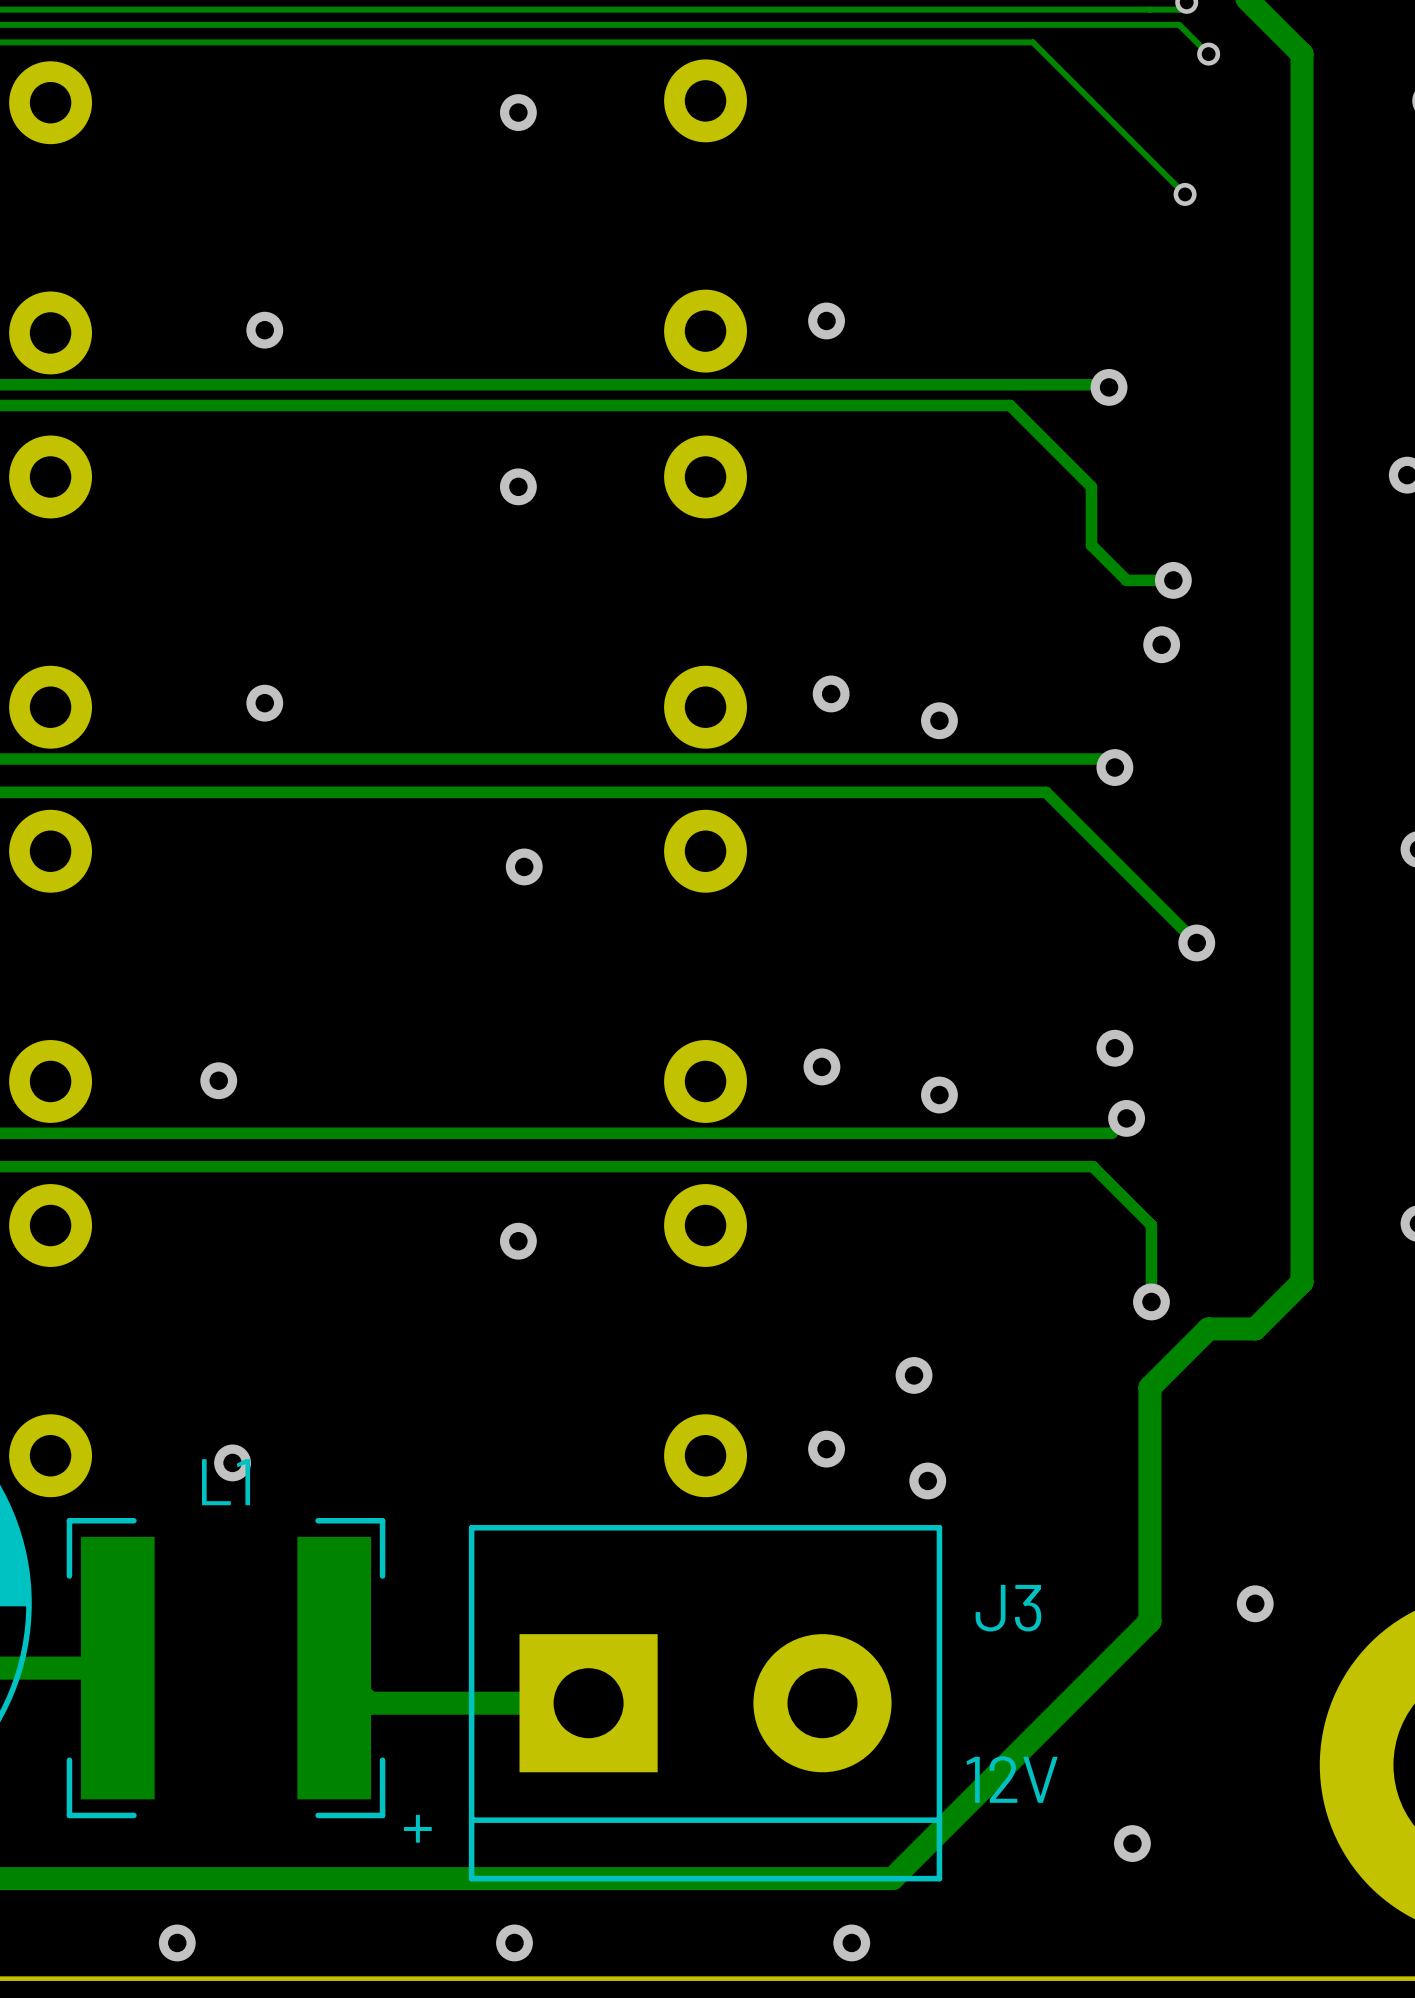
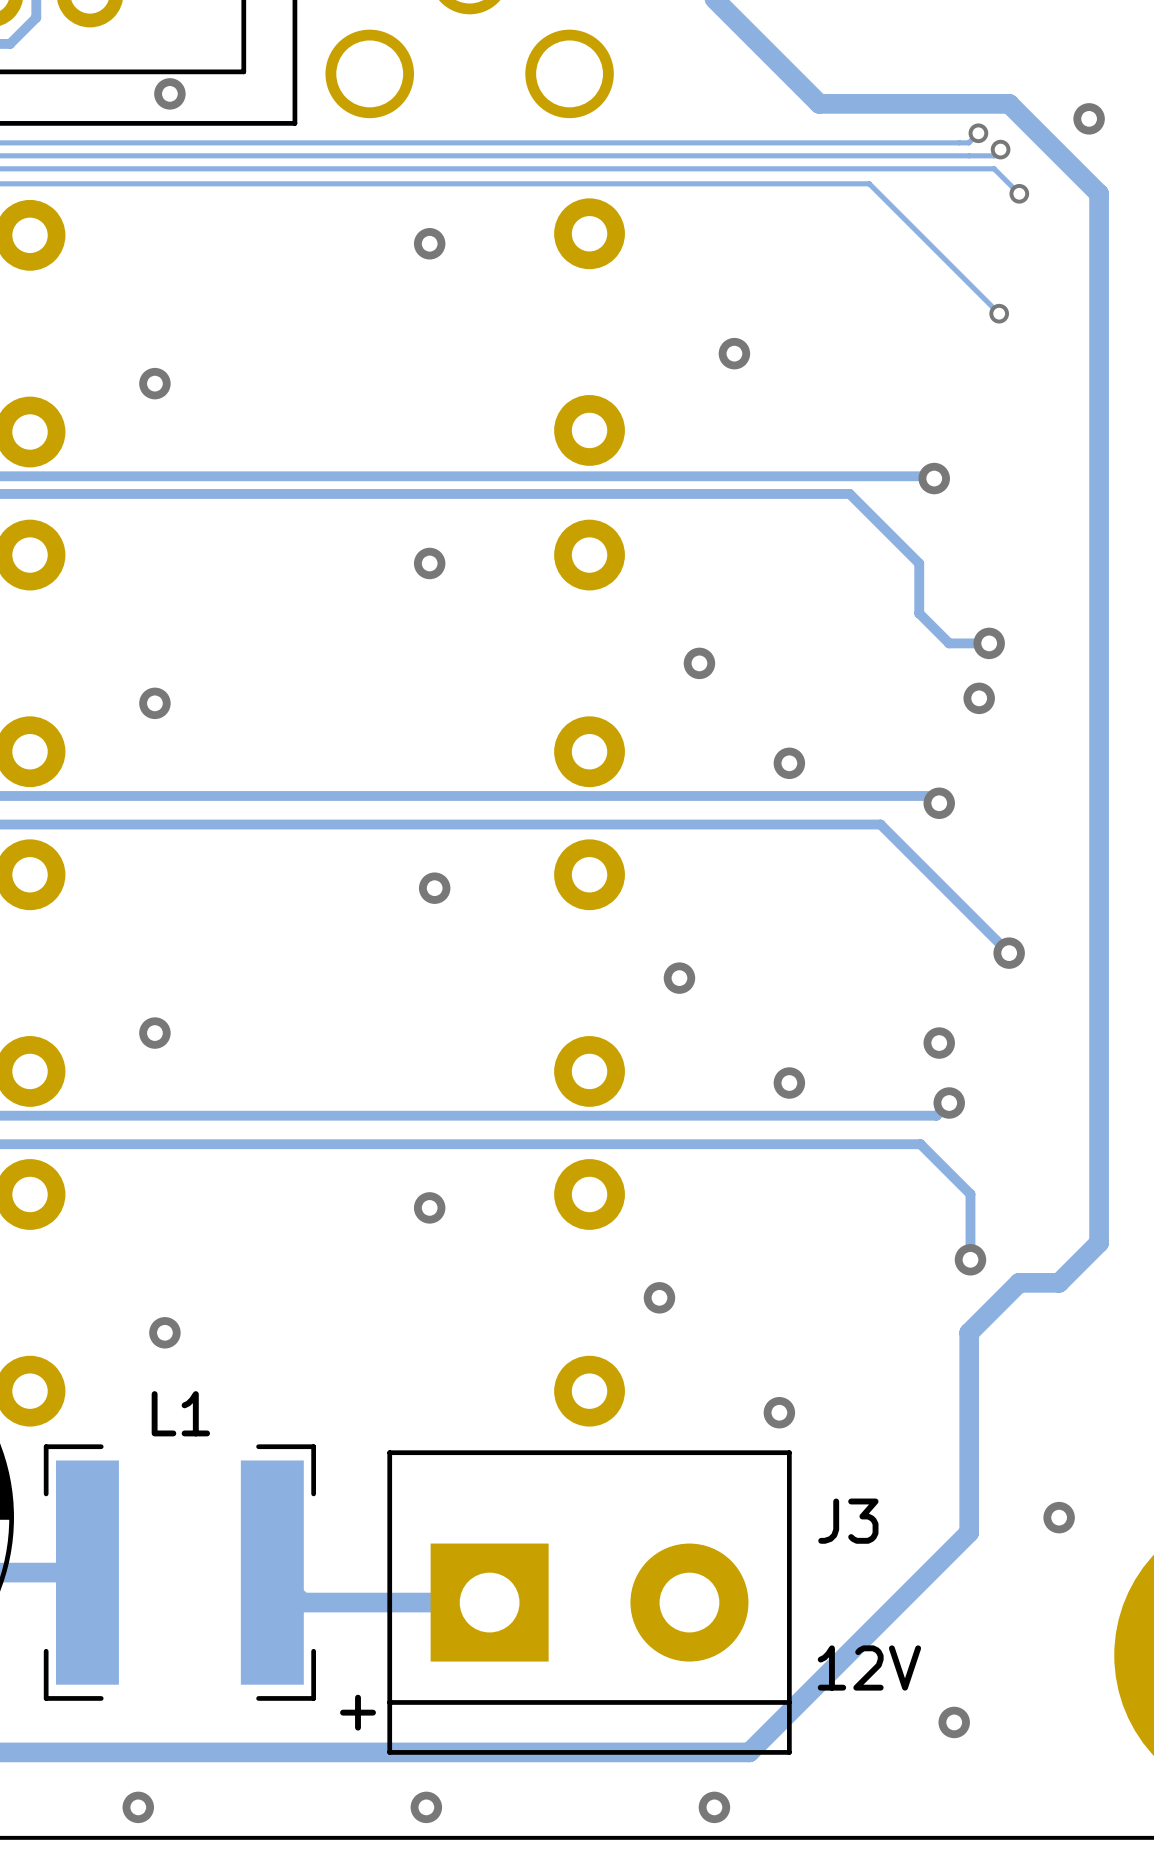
via position: (826, 320) -> (734, 353)
via position: (264, 330) -> (154, 383)
via position: (831, 693) -> (699, 663)
via position: (264, 703) -> (154, 703)
via position: (821, 1066) -> (679, 978)
via position: (218, 1080) -> (154, 1033)
via: none -> (659, 1297)
via: (914, 1375) -> none
via: (826, 1449) -> none
via position: (232, 1462) -> (164, 1332)

